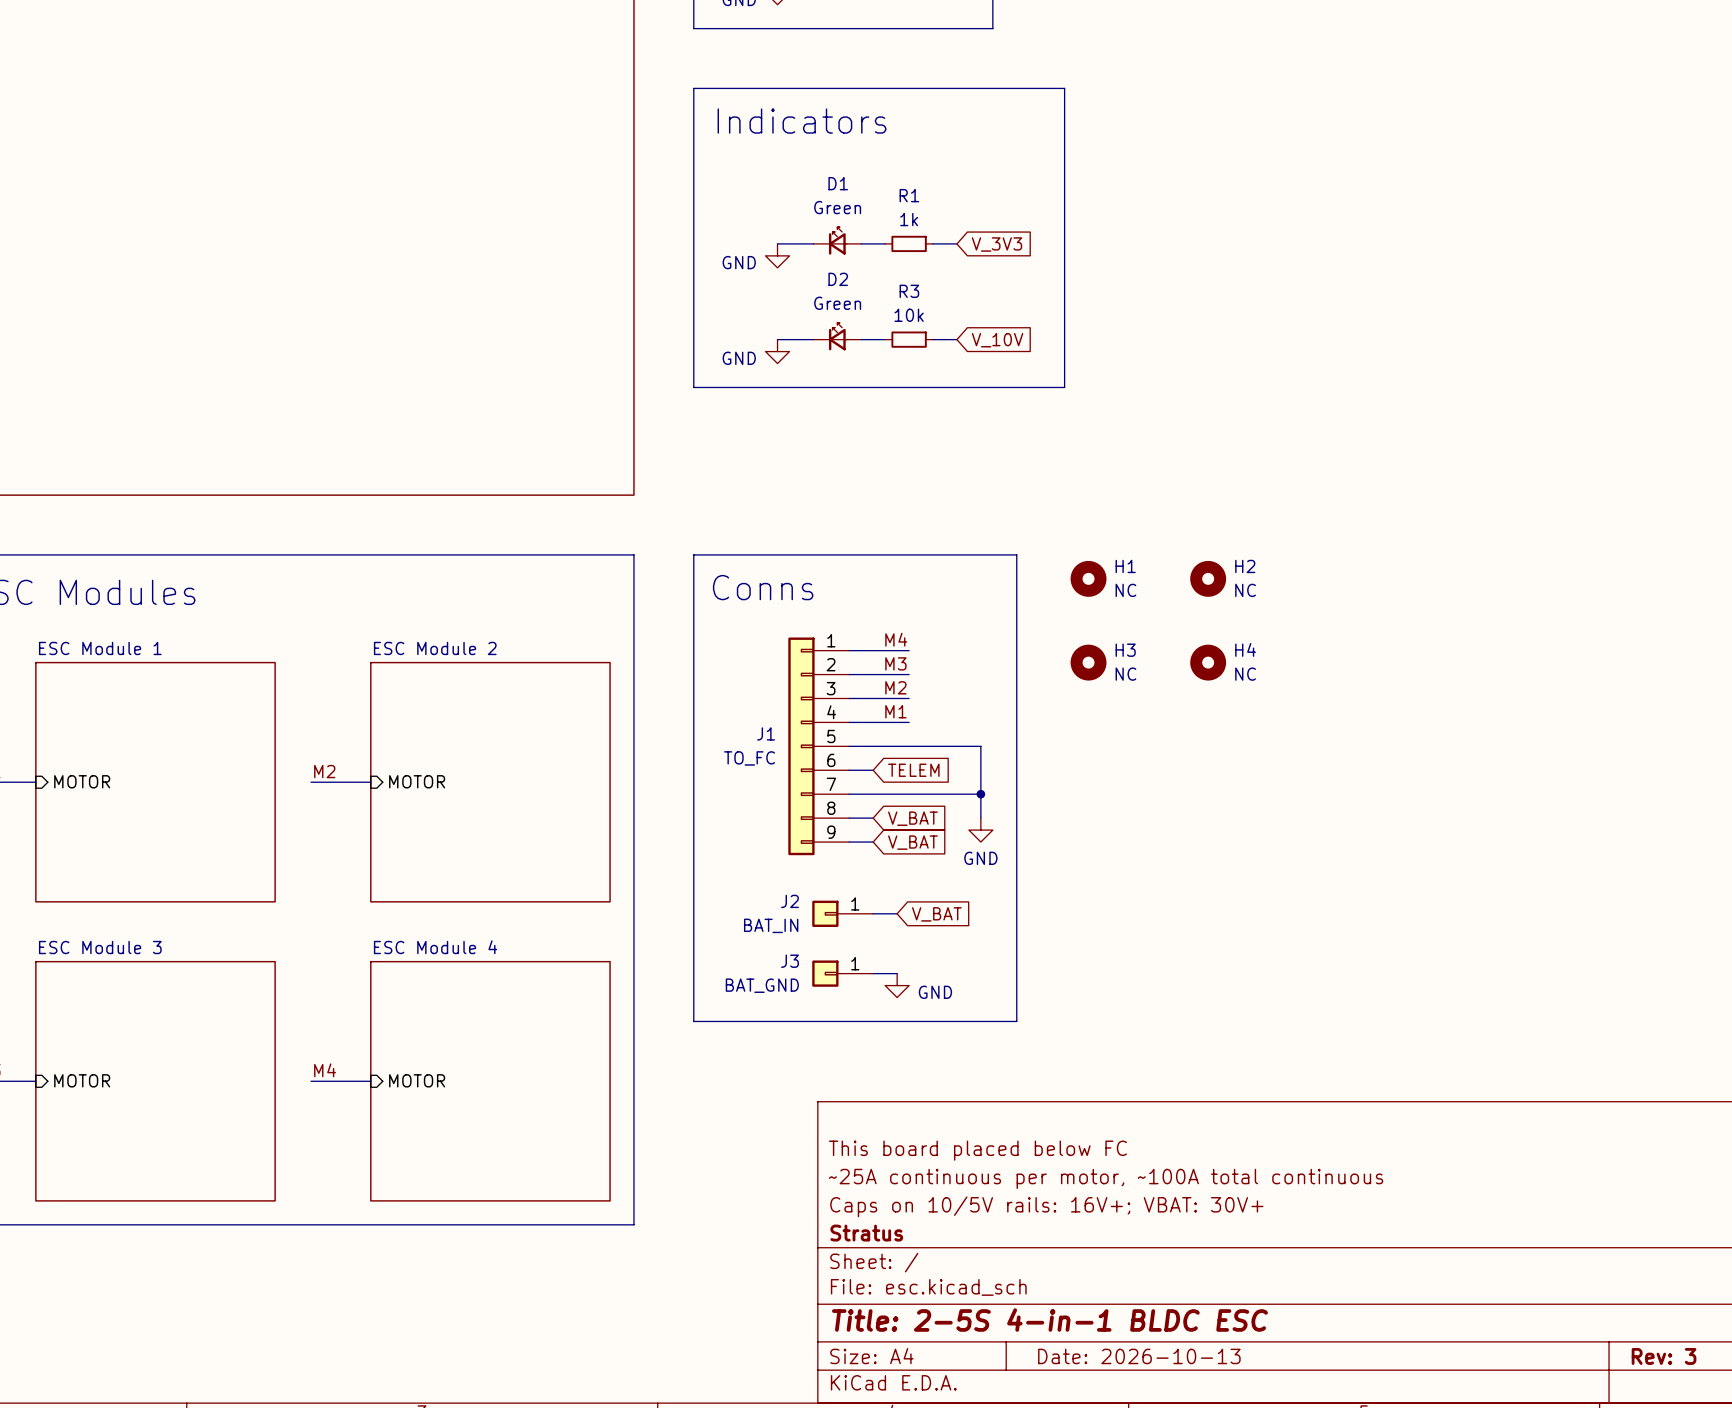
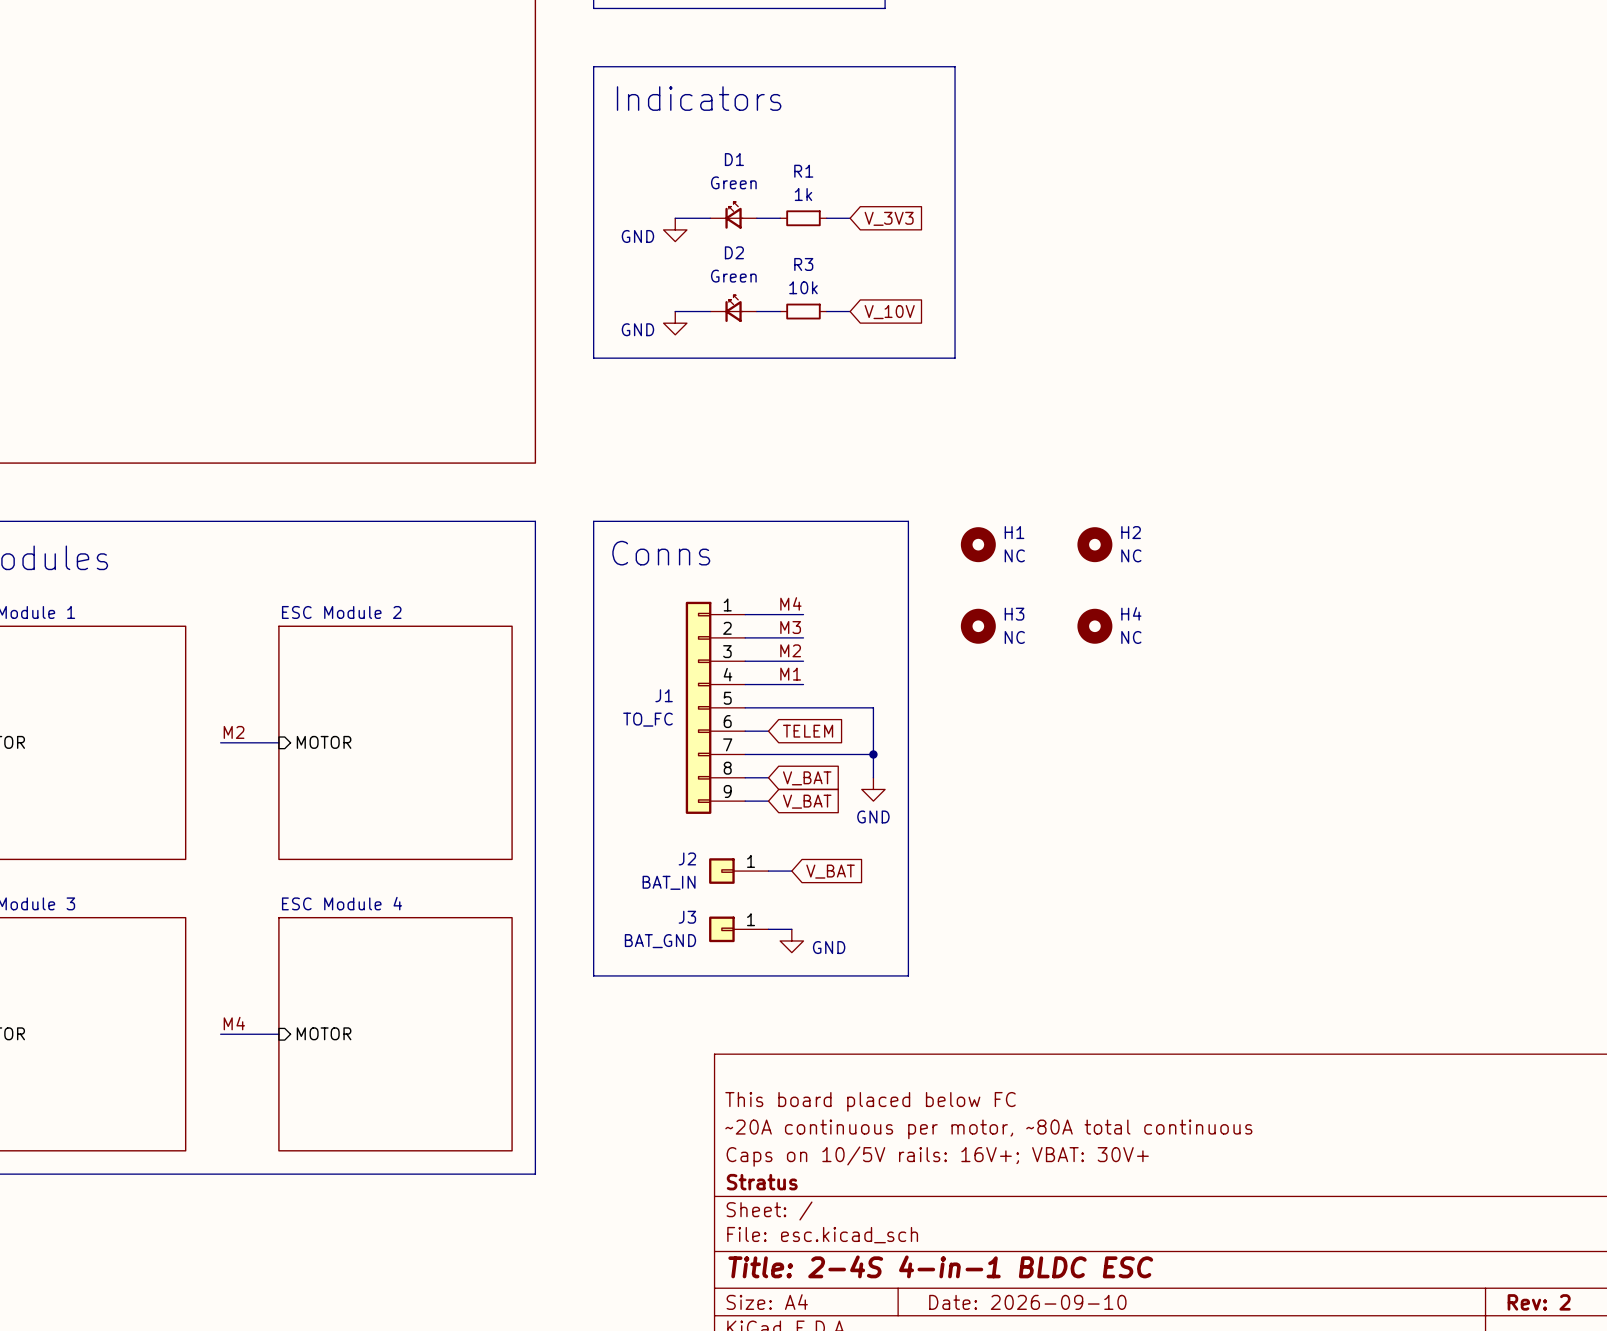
title block: ~25A continuous per motor, ~100A total continuous (1106, 1178) -> ~20A continuous per motor, ~80A total continuous (988, 1129)
title block: Title: 2-5S 4-in-1 BLDC ESC (1049, 1320) -> Title: 2-4S 4-in-1 BLDC ESC (940, 1266)
title block: Date: 2026-10-13 (1139, 1356) -> Date: 2026-09-10 (1027, 1302)
title block: Rev: 3 (1664, 1356) -> Rev: 2 (1539, 1302)

